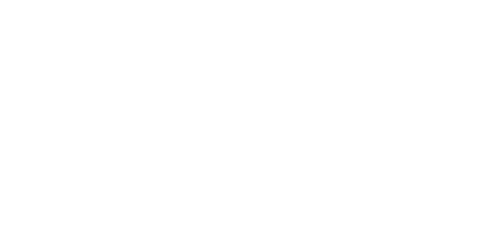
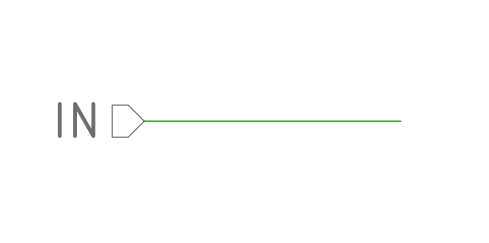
hierarchical label: none -> IN (76, 119)
wire: none -> (144, 121) (400, 121)

